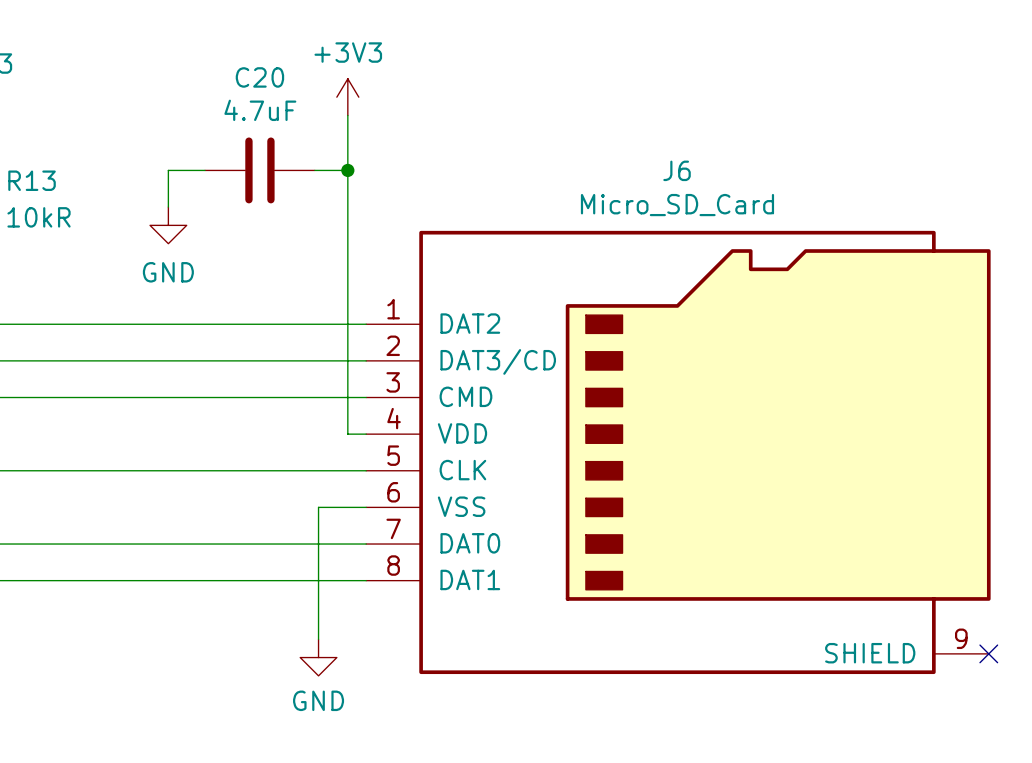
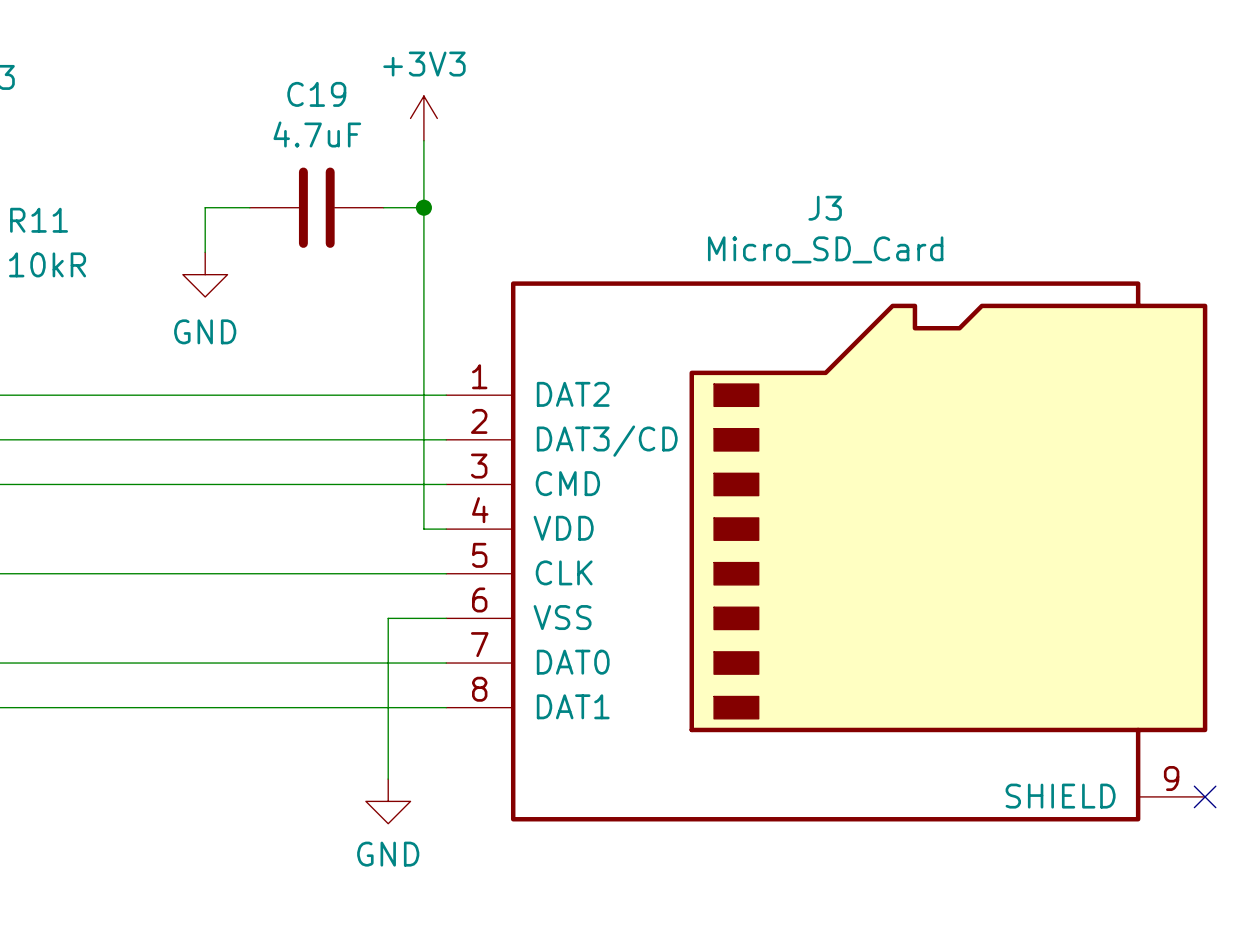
C20 name: C20 (259, 77) -> C19 (316, 94)
J6 name: J6 (677, 170) -> J3 (825, 208)
R13 name: R13 (32, 180) -> R11 (39, 220)

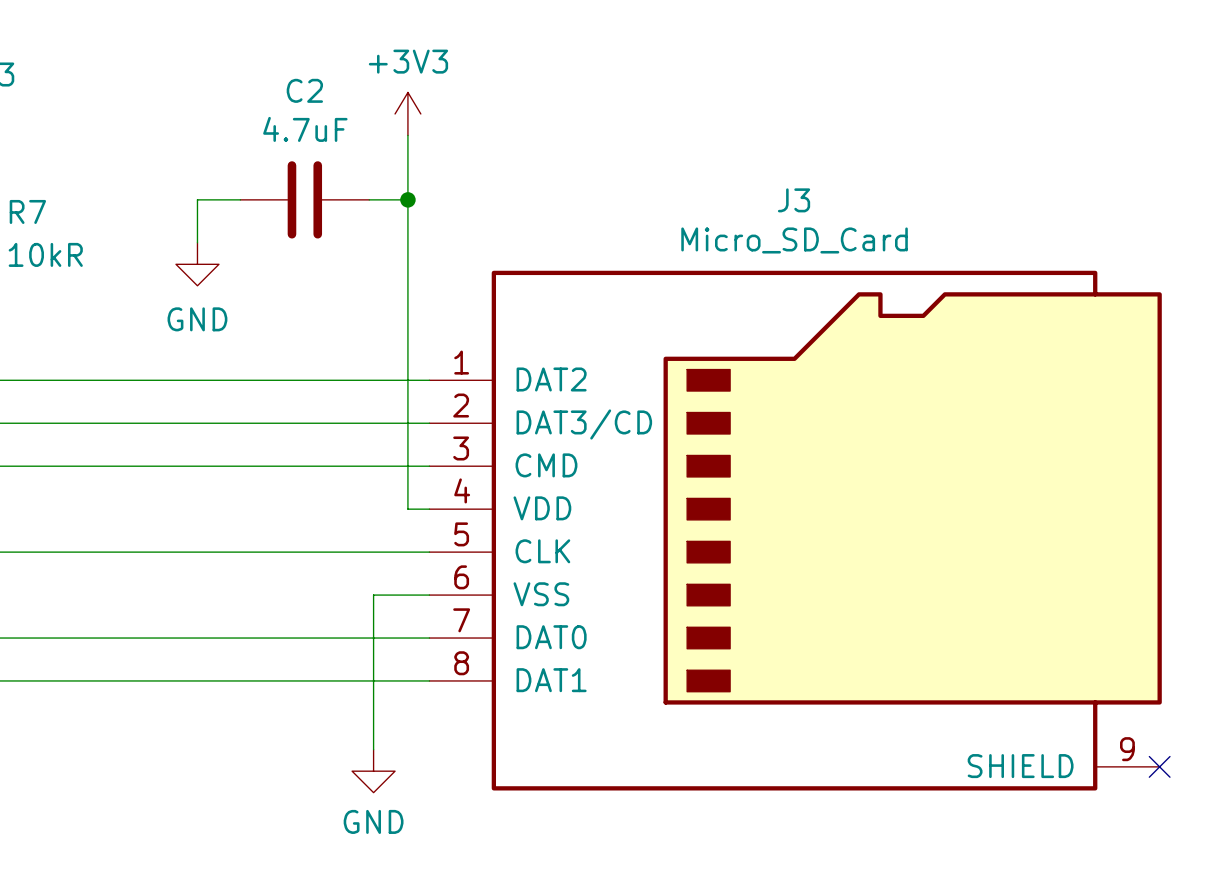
C19 name: C19 (316, 94) -> C2 (304, 90)
R11 name: R11 (39, 220) -> R7 (27, 211)

